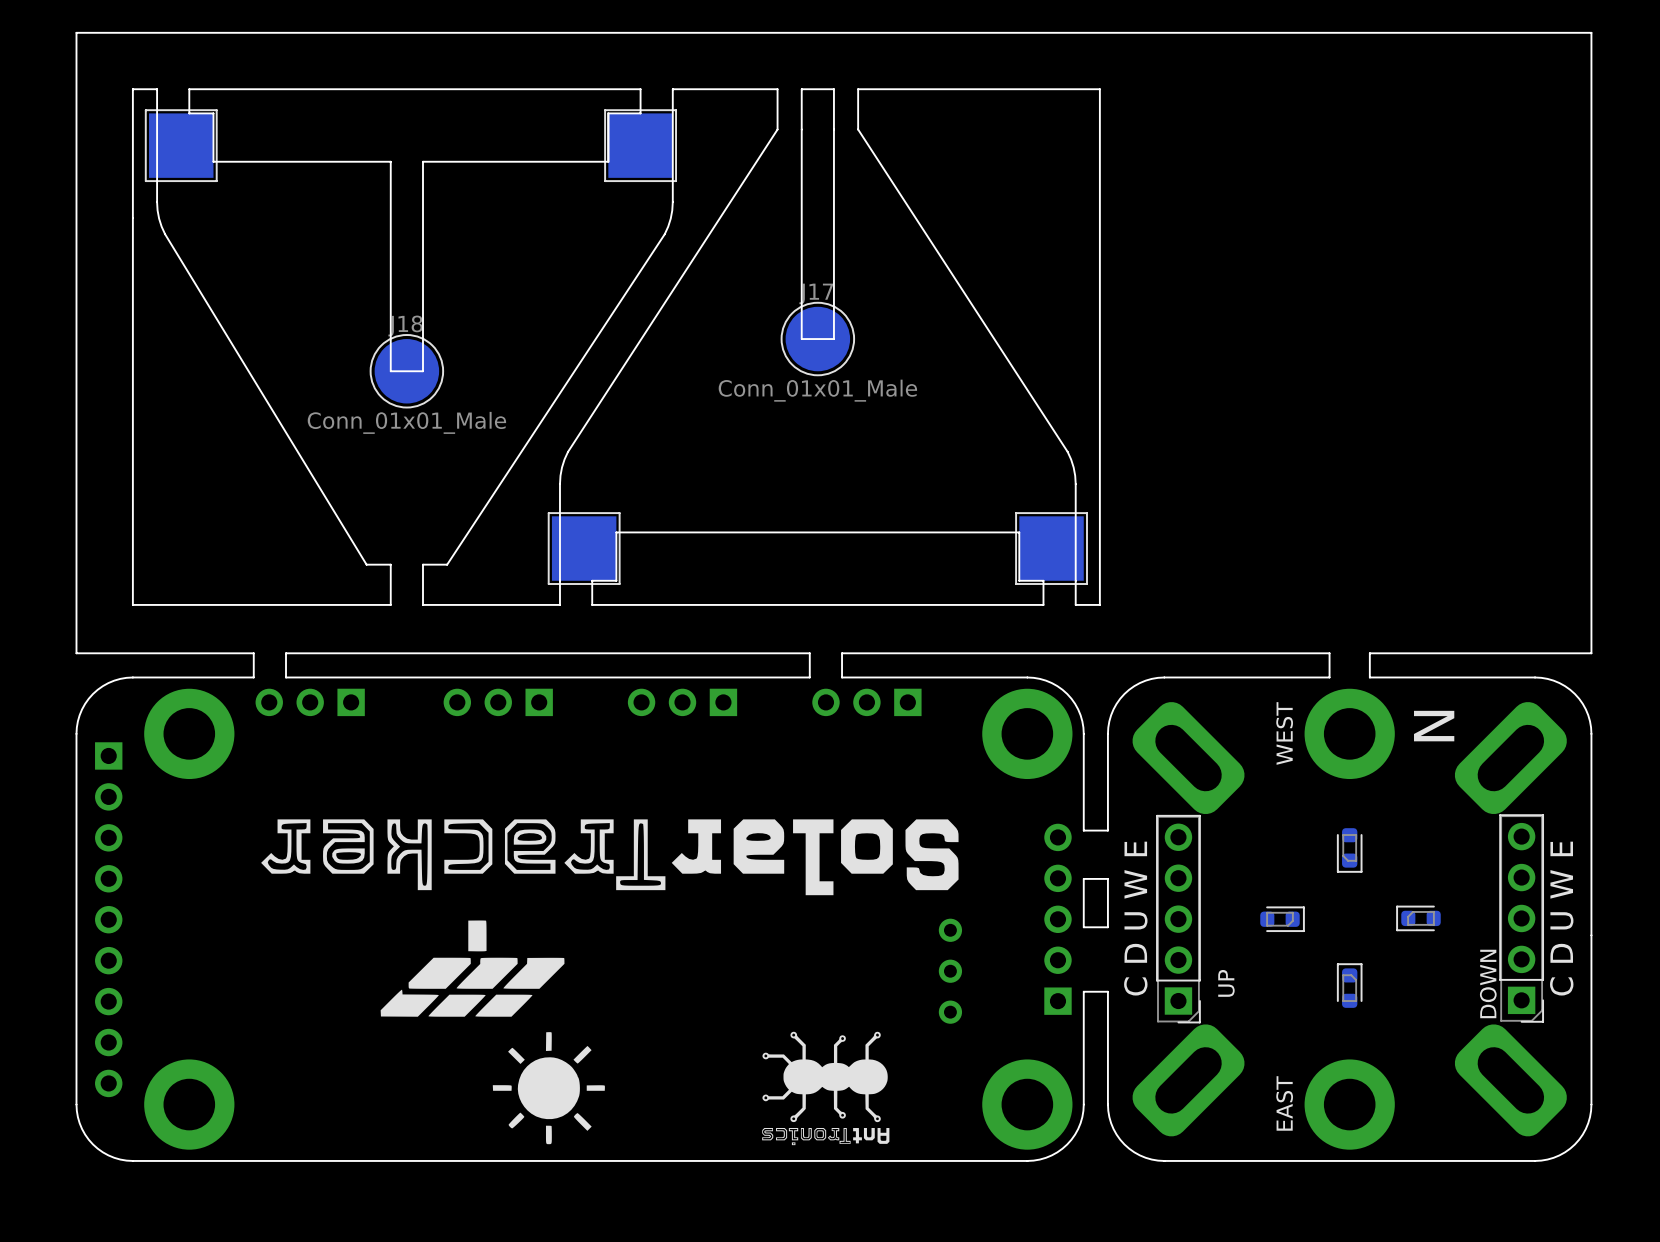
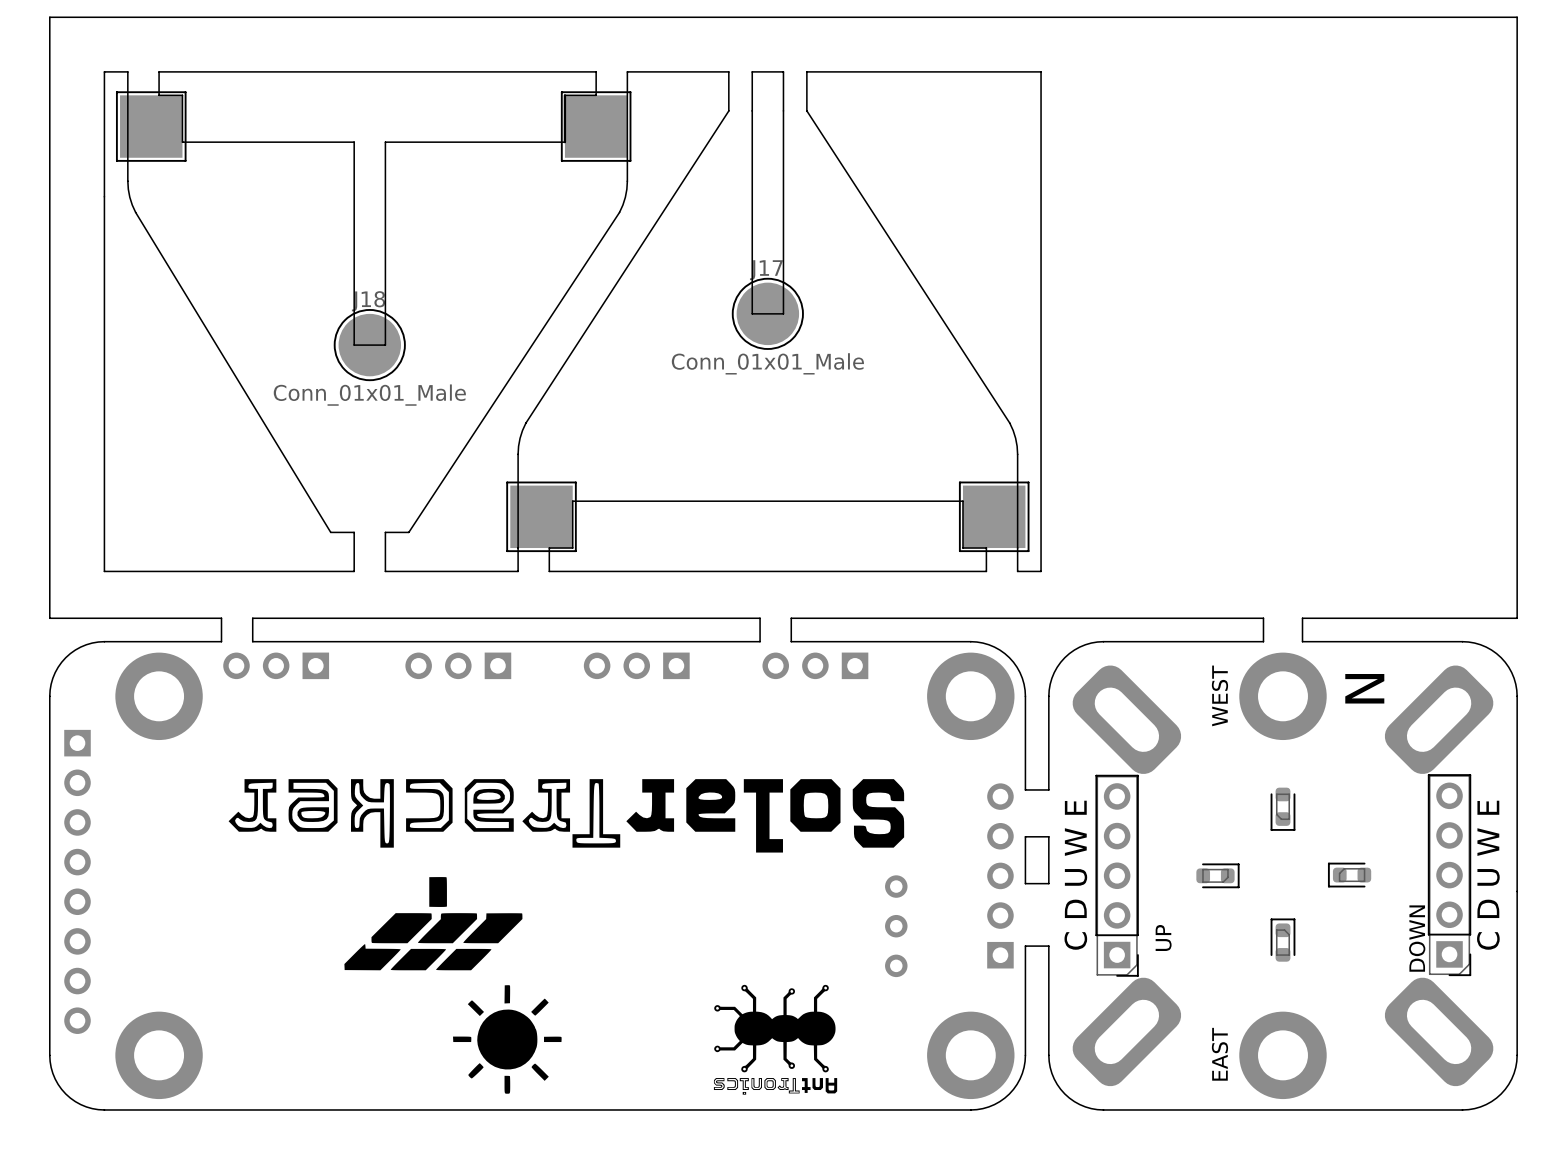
part footprint: [95, 742, 123, 1098] -> [64, 729, 91, 1034]

